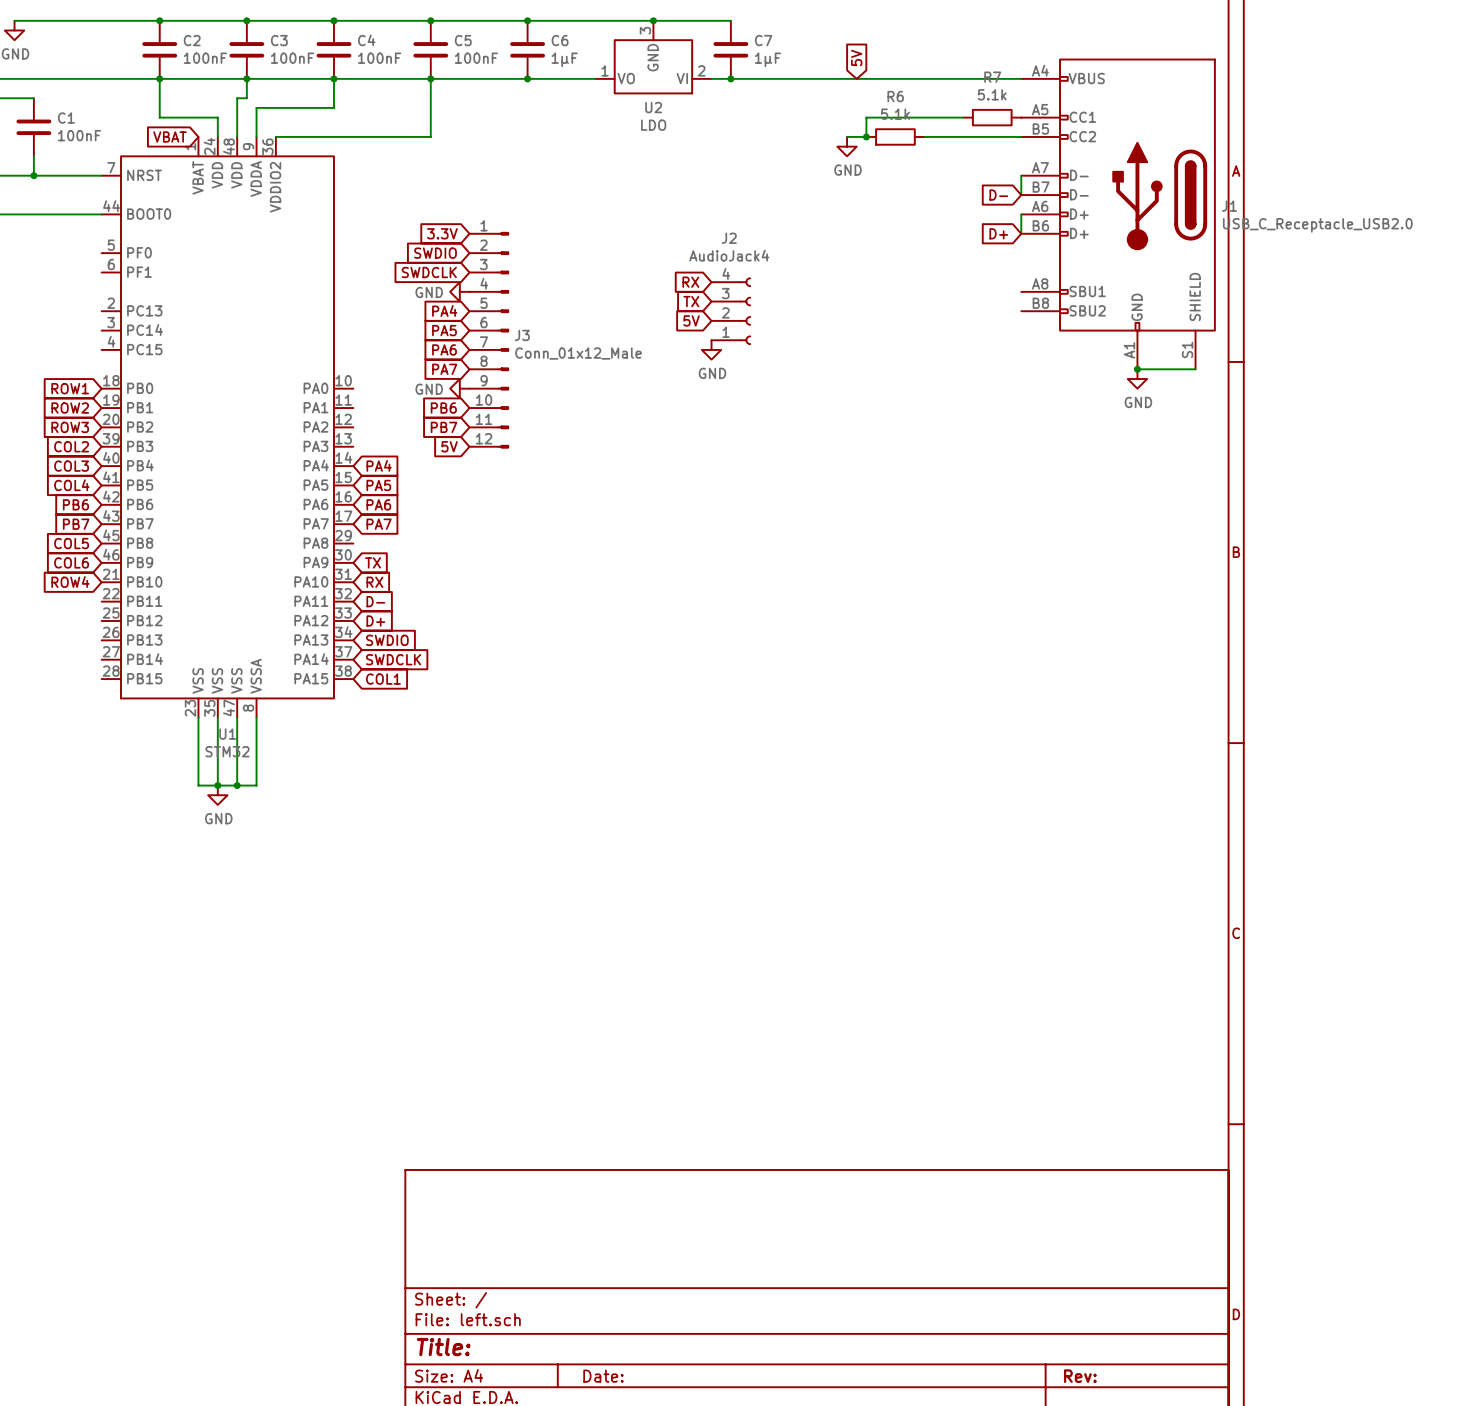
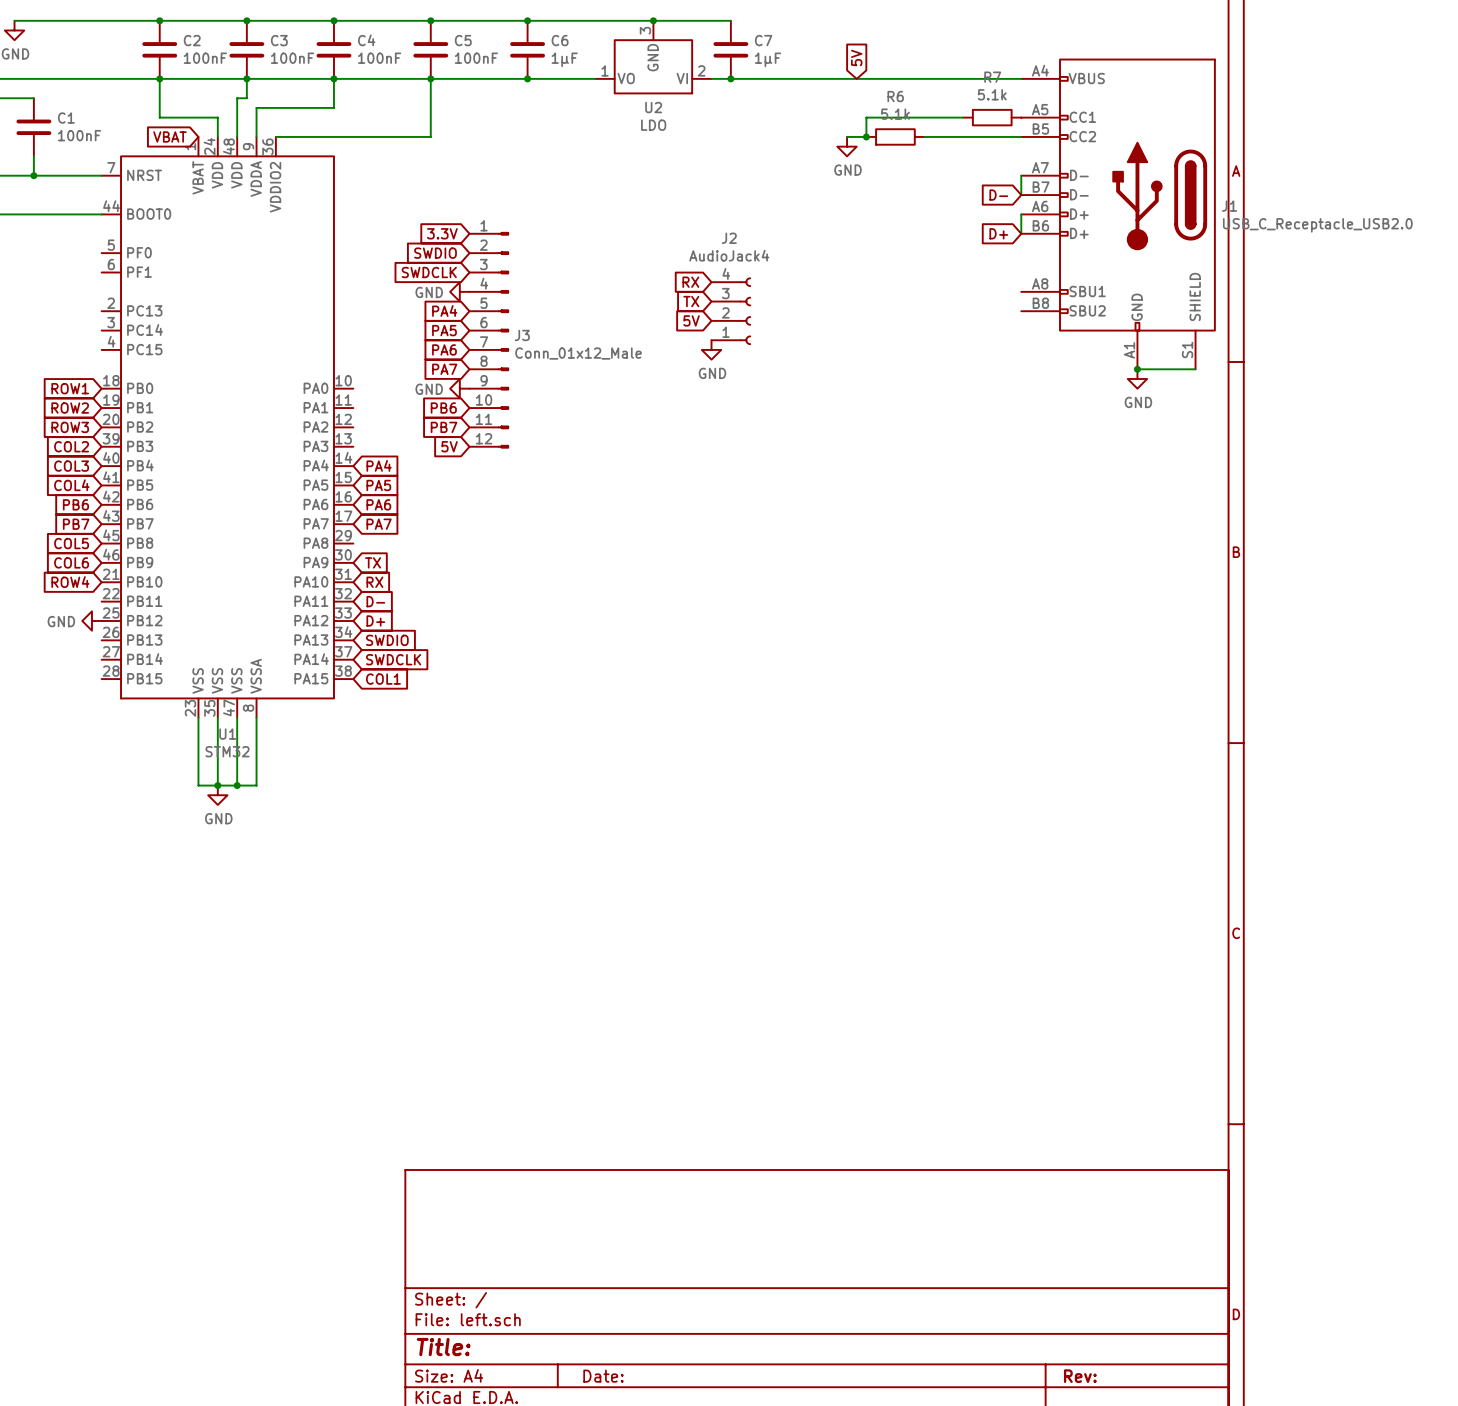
power symbol: none -> GND (91, 620)

